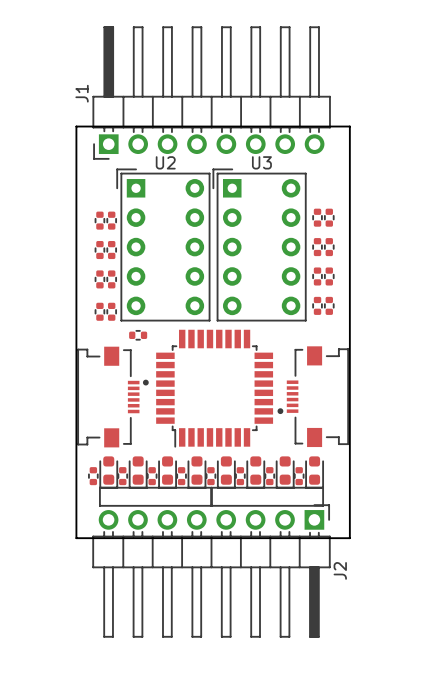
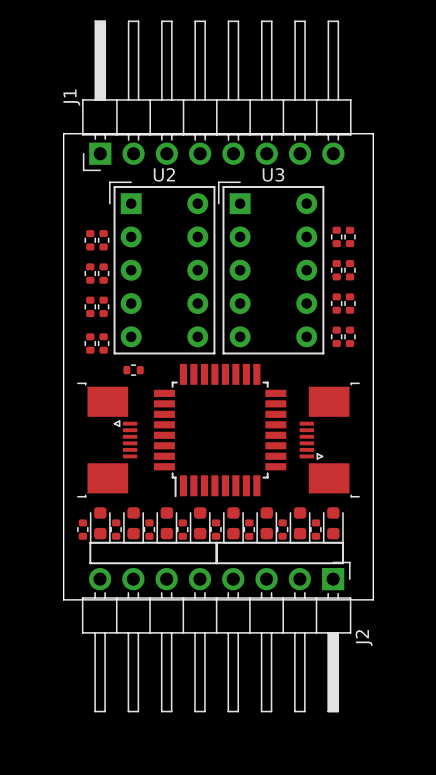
part footprint: [77, 346, 149, 448] -> [77, 382, 138, 498]
part footprint: [277, 346, 350, 448] -> [299, 382, 360, 498]

